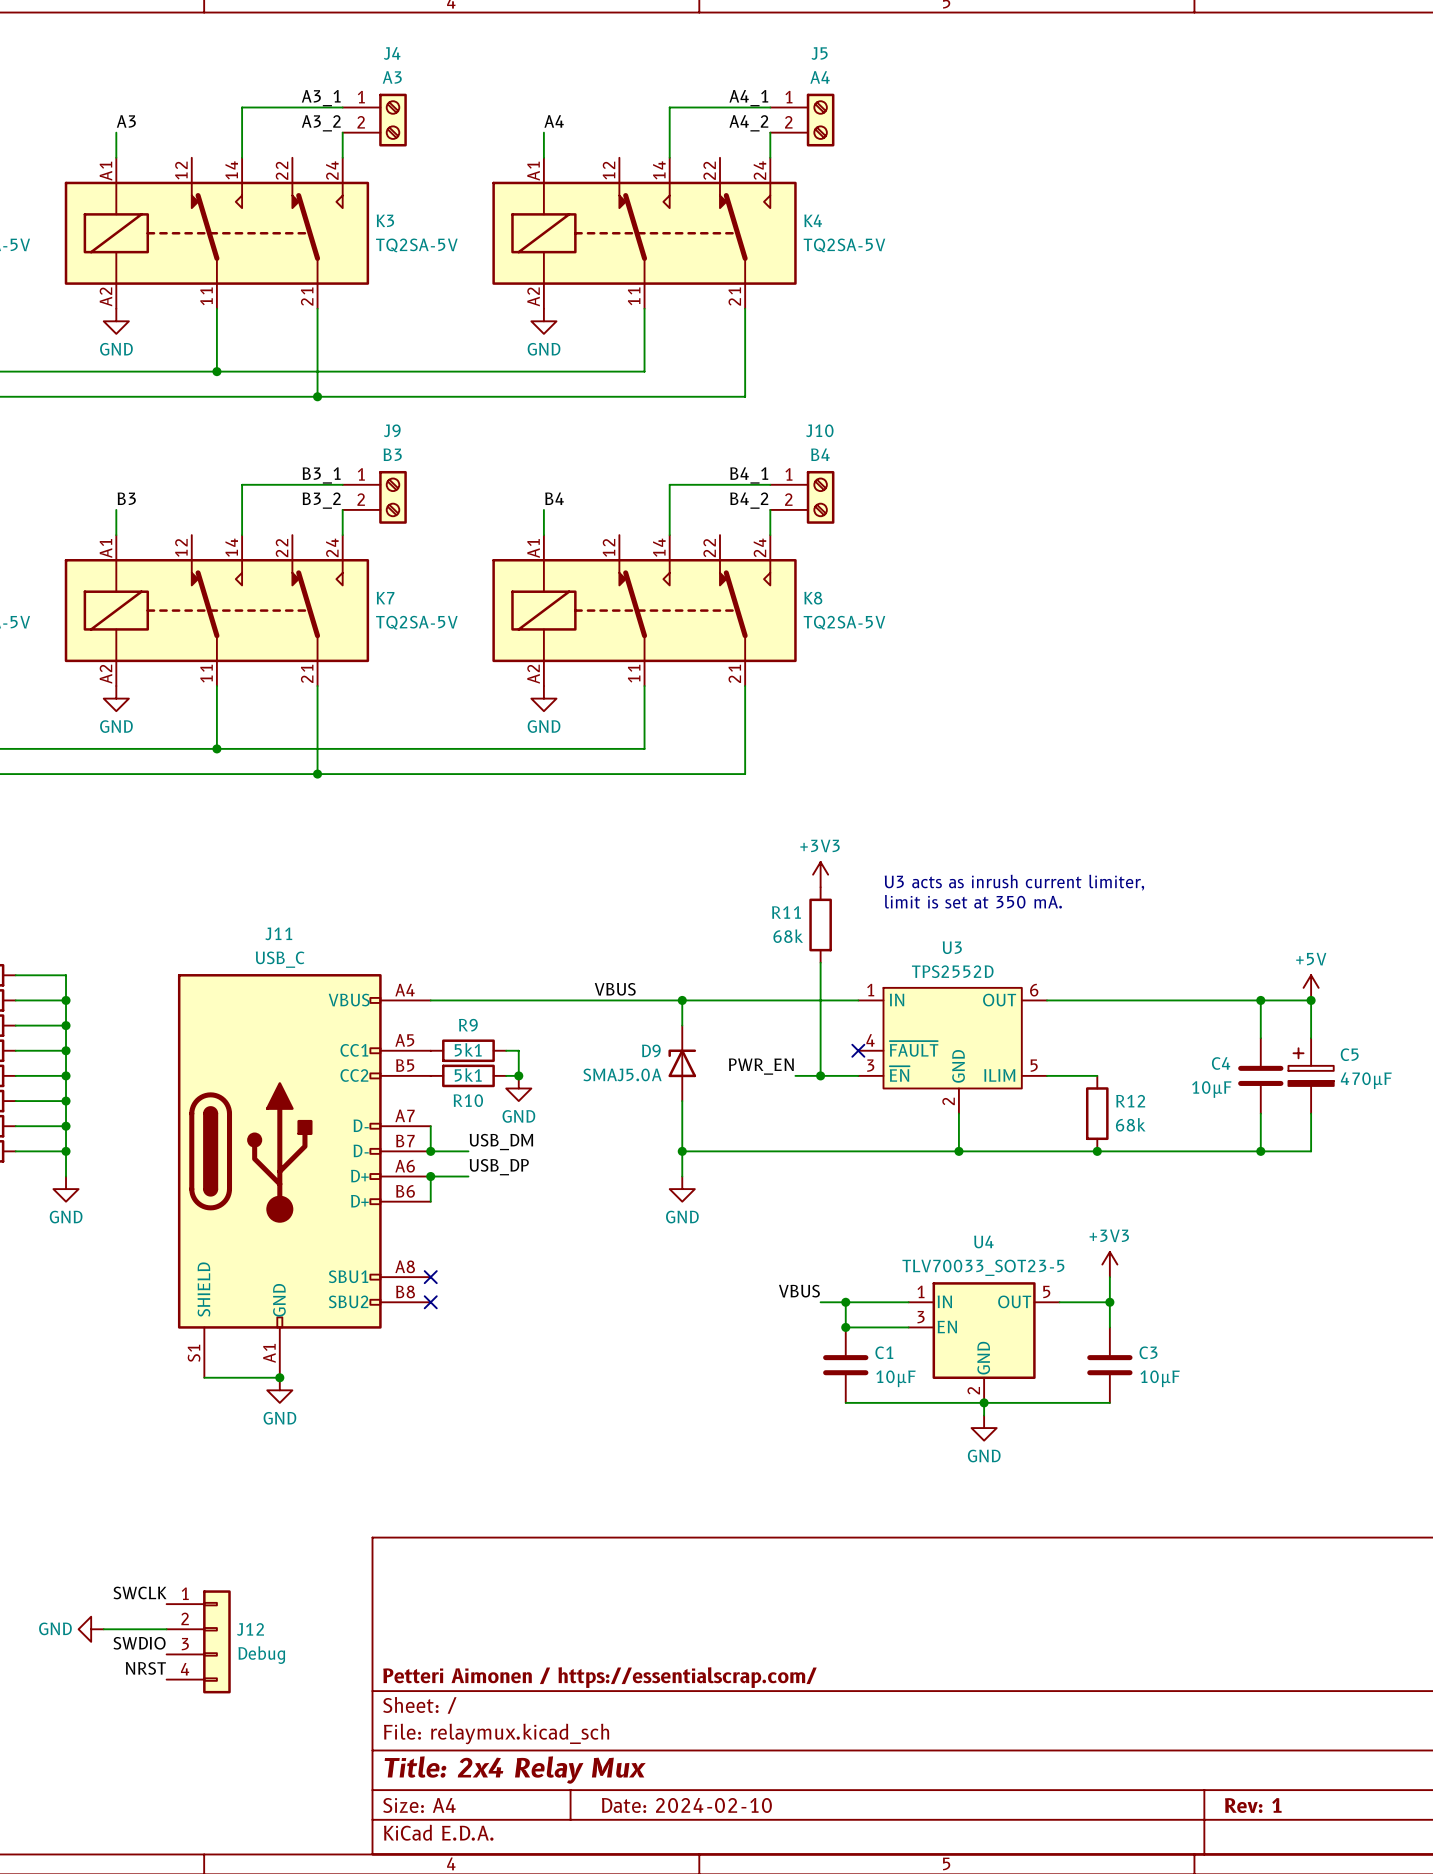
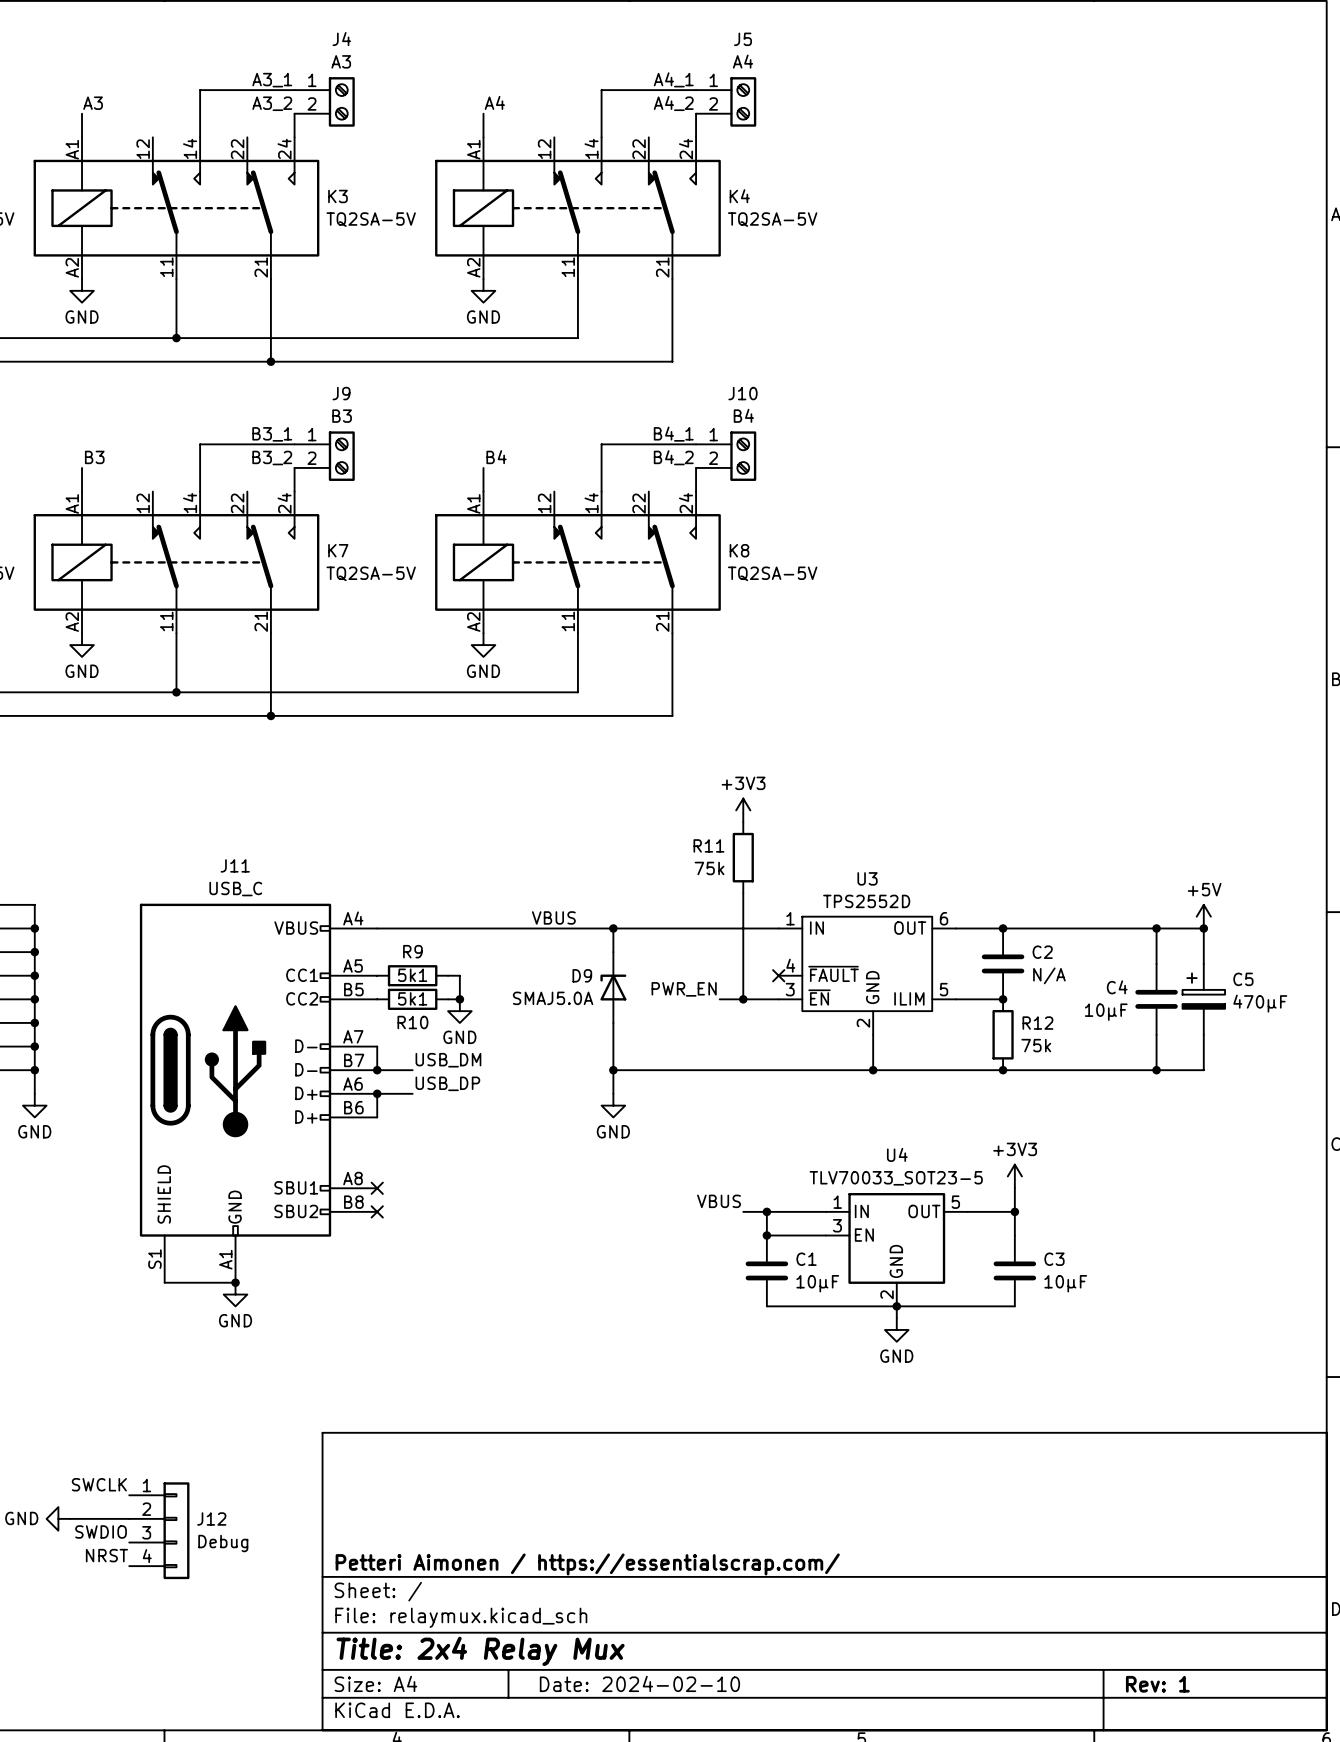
text: U3 acts as inrush current limiter, (1014, 882) -> none
text: limit is set at 350 mA. (973, 901) -> none
R11 value: 68k (788, 936) -> 75k (709, 868)
junction: none -> (1003, 928)
C2: none -> N/A (1003, 963)
junction: none -> (1003, 999)
R12 value: 68k (1130, 1124) -> 75k (1036, 1045)

